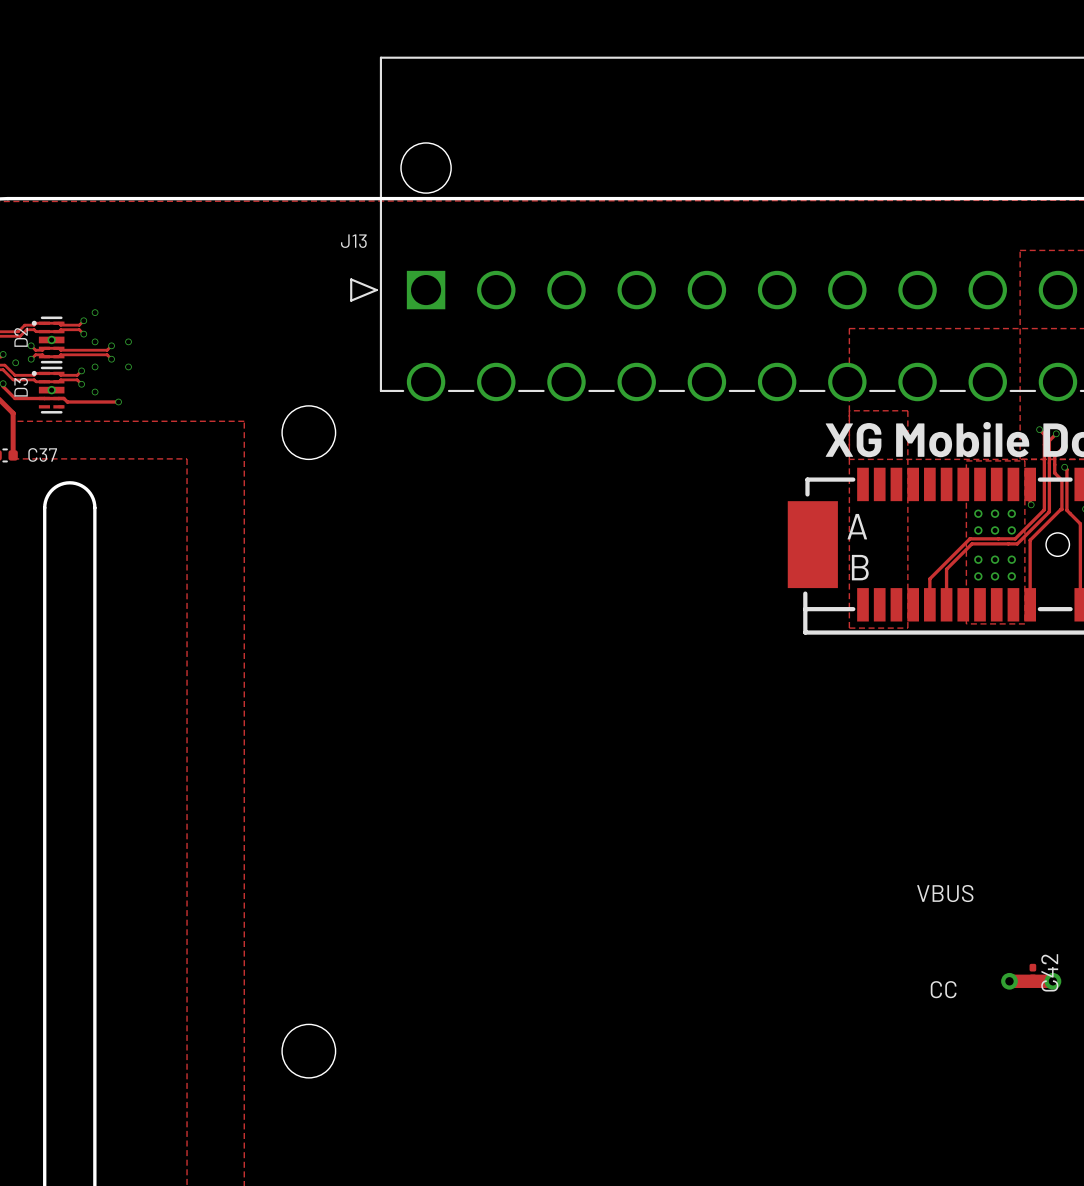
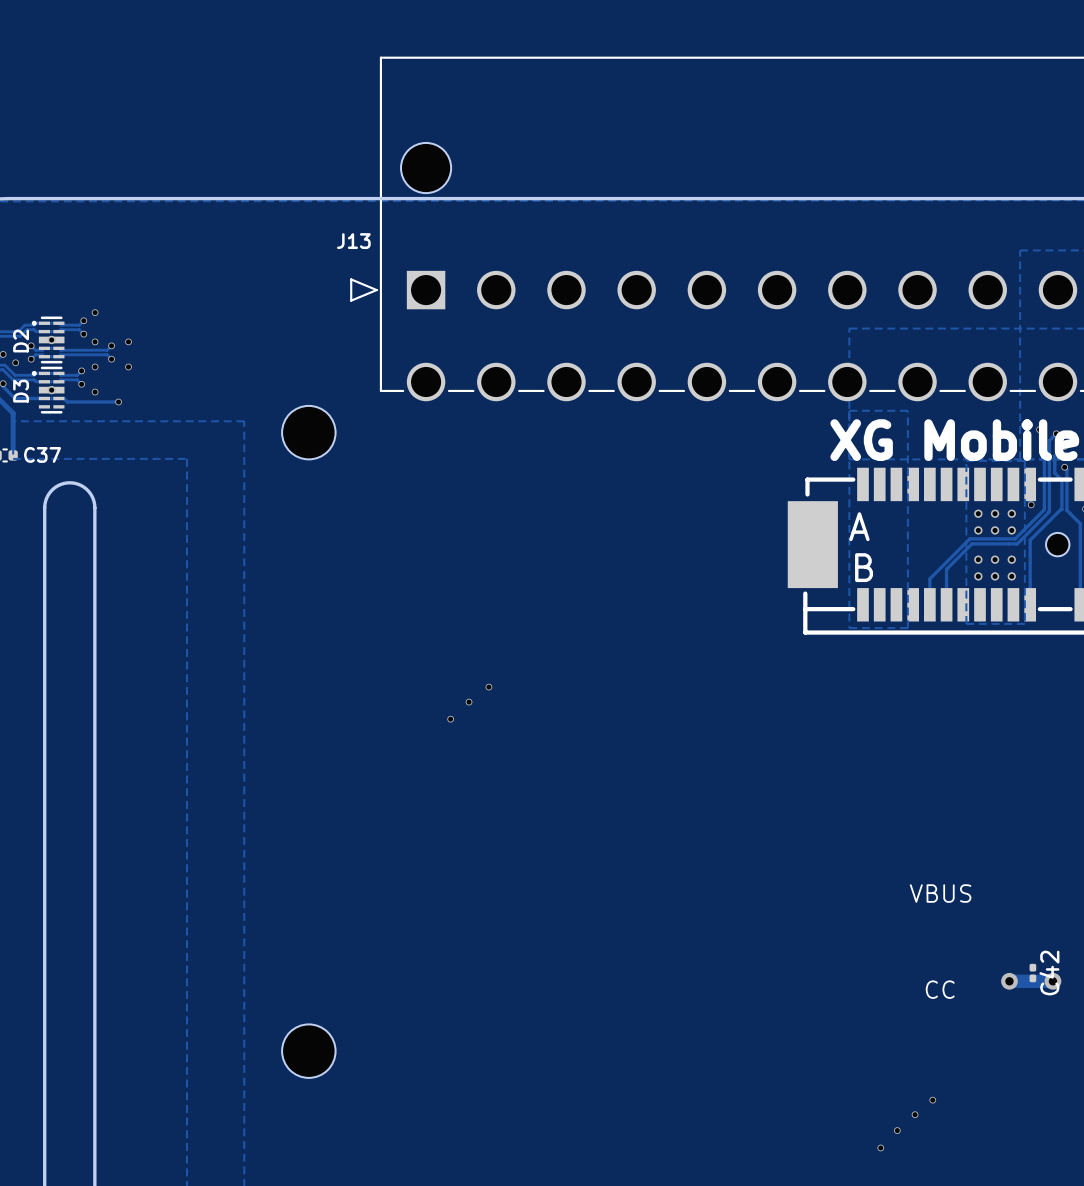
via: none -> (488, 687)
via: none -> (469, 702)
via: none -> (450, 719)
via: none -> (932, 1100)
via: none -> (915, 1114)
via: none -> (897, 1130)
via: none -> (880, 1147)

